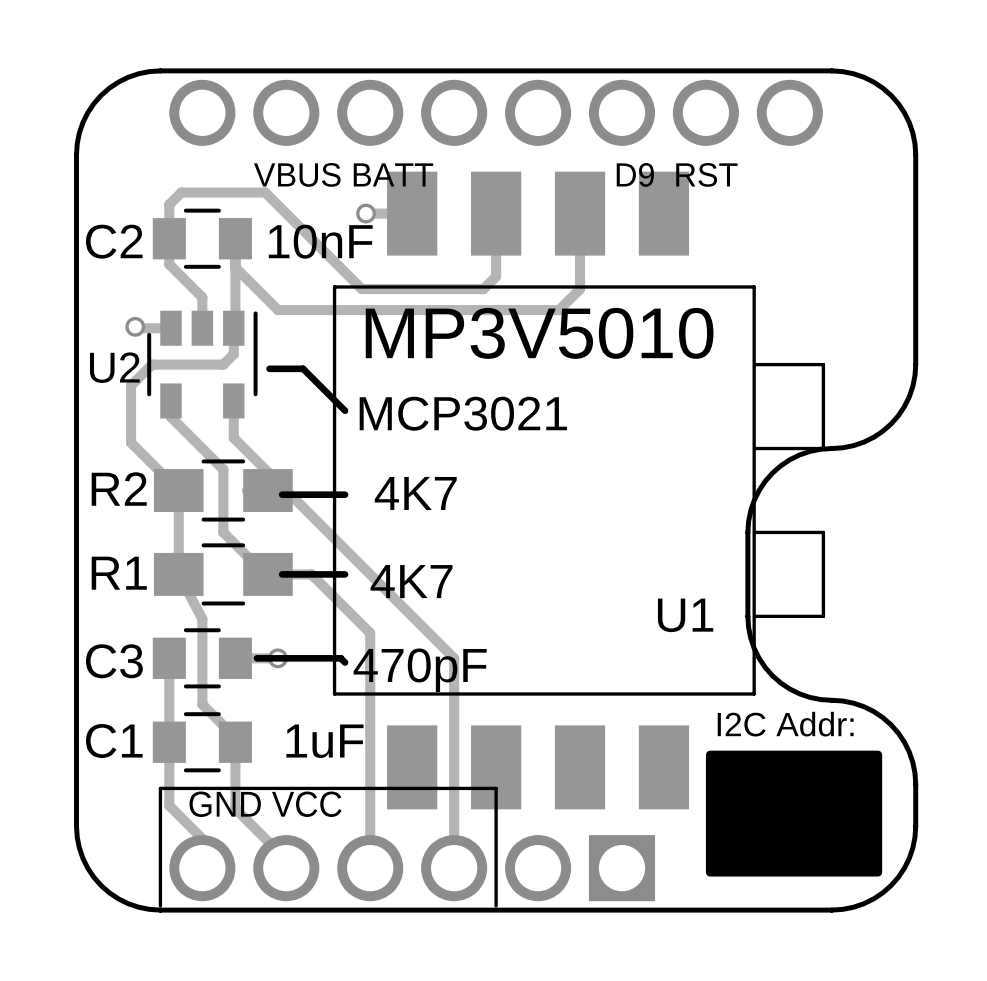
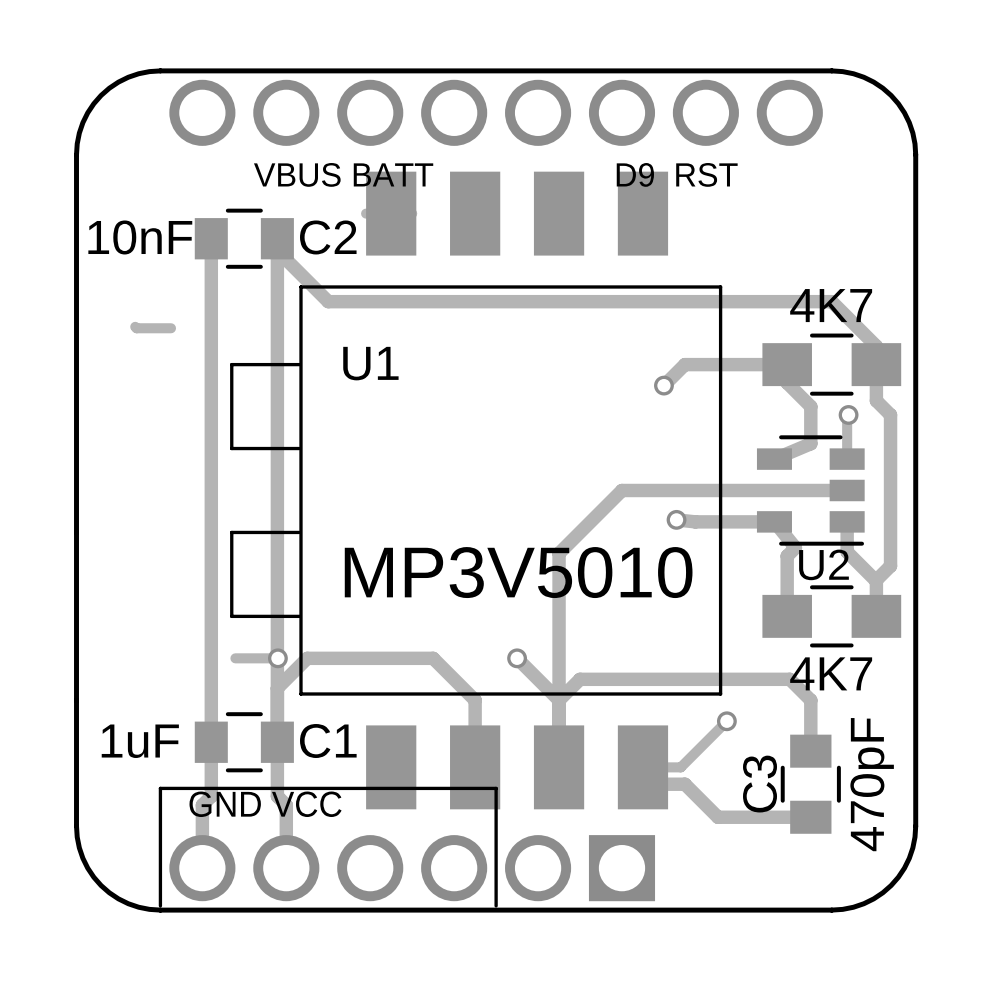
via: (366, 213) -> none
track: (496, 213) (496, 276) (483, 289) (361, 289) (265, 192) (181, 192) (169, 204) (169, 264) (202, 297) (202, 328) -> none
track: (580, 213) (580, 289) (559, 310) (277, 310) (235, 267) -> none
C2 position: (202, 238) -> (244, 238)
track: (235, 238) (233, 354) (223, 364) (152, 364) (131, 385) (131, 442) (178, 490) (178, 574) (202, 619) (202, 704) (235, 737) (235, 808) (286, 859) -> (277, 238) (277, 796) (286, 805) (286, 859)
C2 name position: C2 (114, 241) -> C2 (328, 237)
C2 value position: 10nF (320, 241) -> 10nF (140, 237)
track: none -> (277, 250) (328, 301) (831, 301) (876, 346) (876, 400) (890, 414) (890, 566) (876, 580) (876, 616)
via: (135, 326) -> none
U1 value position: MP3V5010 (539, 333) -> MP3V5010 (518, 572)
U2 rotation: 0° (202, 364) -> 90° clockwise (810, 490)
U2 position: (202, 364) -> (810, 490)
part: none -> 4K7 (831, 364)
board edge: (915, 364) (912, 386) (904, 406) (882, 431) (853, 445) (820, 449) (799, 454) (772, 473) (754, 500) (747, 532) (748, 627) (759, 658) (772, 675) (799, 693) (820, 699) (853, 703) (882, 717) (904, 742) (912, 762) (915, 784) -> (915, 364) (915, 784)
U2 name position: U2 (114, 367) -> U2 (823, 564)
line: (269, 368) (303, 368) (345, 410) -> none
track: none -> (663, 385) (684, 364) (787, 364) (787, 382) (810, 406) (810, 443) (774, 459)
via: none -> (663, 385)
track: (170, 400) (170, 417) (223, 469) (223, 532) (265, 574) (311, 574) (370, 633) (370, 868) -> none
track: (233, 400) (233, 437) (267, 472) (267, 490) -> none
U2 value: MCP3021 (463, 413) -> none
track: none -> (848, 414) (847, 459)
via: none -> (848, 414)
R2: 4K7 (223, 490) -> none
track: (246, 490) (286, 490) (454, 658) (454, 868) -> none
U1 rotation: 0° (578, 490) -> 180° (476, 490)
track: none -> (847, 490) (621, 490) (559, 553) (559, 767)
line: (282, 494) (345, 494) -> none
track: none -> (676, 519) (695, 521) (774, 521) (795, 547) (787, 556) (787, 616)
via: none -> (676, 519)
track: none -> (847, 521) (847, 552) (876, 581)
R1: 4K7 (223, 574) -> none
line: (282, 574) (345, 574) -> none
part: none -> 4K7 (831, 616)
track: (169, 658) (169, 805) (202, 838) -> (211, 238) (211, 796) (202, 805) (202, 838)
C3 rotation: 0° (202, 658) -> 90° clockwise (810, 784)
C3 position: (202, 658) -> (810, 784)
line: (256, 658) (340, 658) (345, 662) -> none
track: none -> (517, 658) (559, 700) (580, 679) (789, 679) (810, 700) (810, 751)
via: none -> (517, 658)
C3 value position: 470pF (420, 670) -> 470pF (872, 784)
track: none -> (277, 688) (307, 658) (433, 658) (475, 700) (475, 767)
track: none -> (726, 721) (680, 767) (642, 767) (659, 784) (684, 784) (717, 817) (810, 817)
via: none -> (726, 721)
text: I2C Addr: (785, 724) -> none
C1 name position: C1 (114, 741) -> C1 (328, 741)
C1 value position: 1uF (324, 741) -> 1uF (140, 741)
C1 position: (202, 742) -> (244, 742)
drawing: [705, 750, 883, 877] -> none

